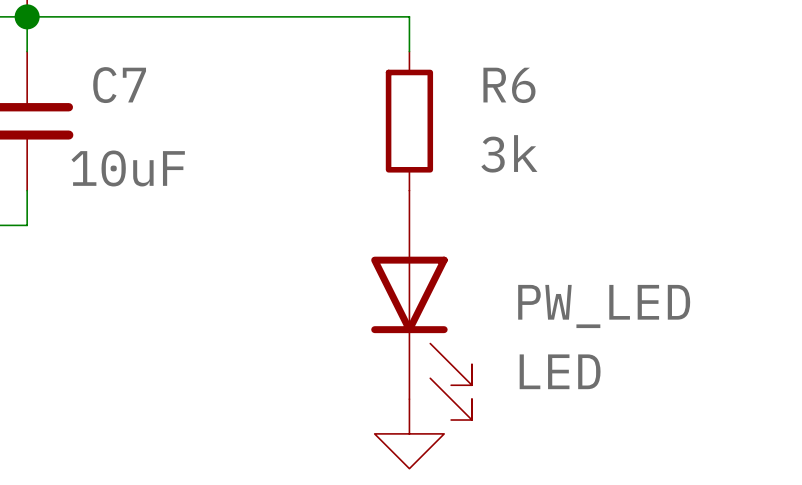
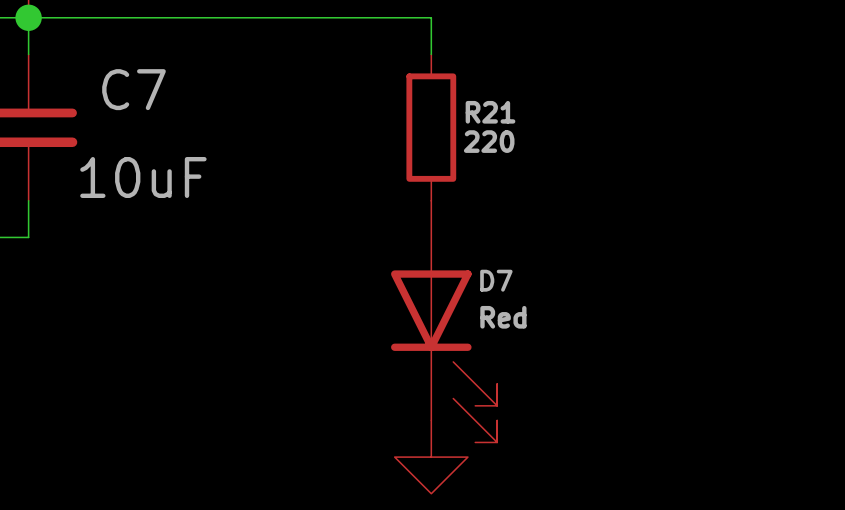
R6 name: R6 (509, 85) -> R21 (490, 112)
R6 value: 3k (509, 153) -> 220 (489, 141)
PW_LED name: PW_LED (604, 306) -> D7 (496, 280)
PW_LED value: LED (560, 371) -> Red (503, 317)

